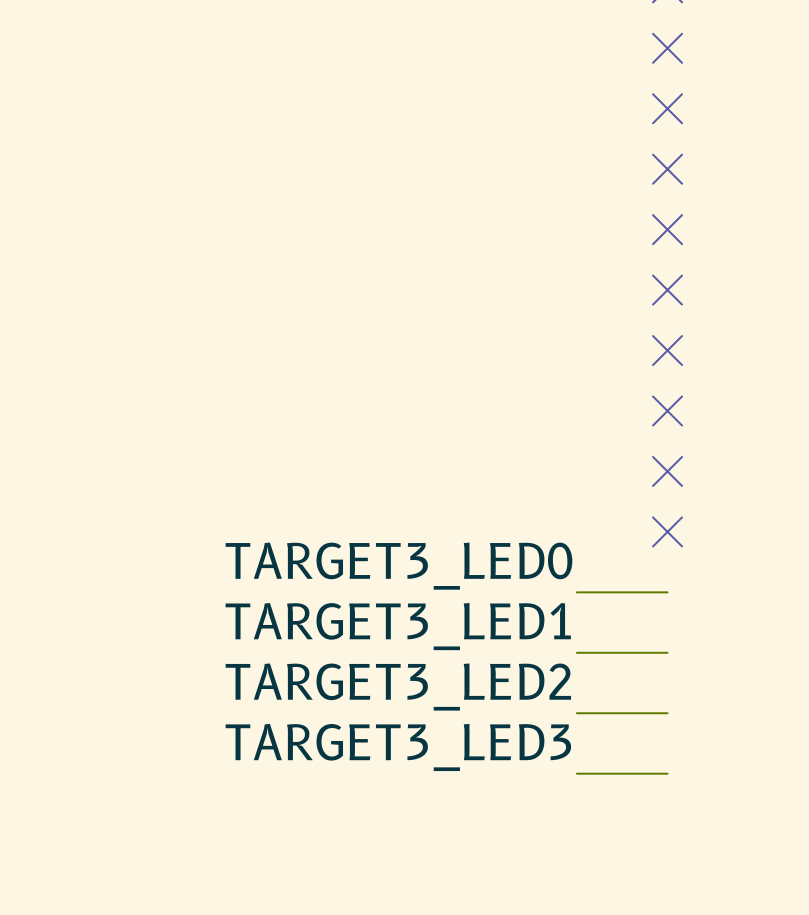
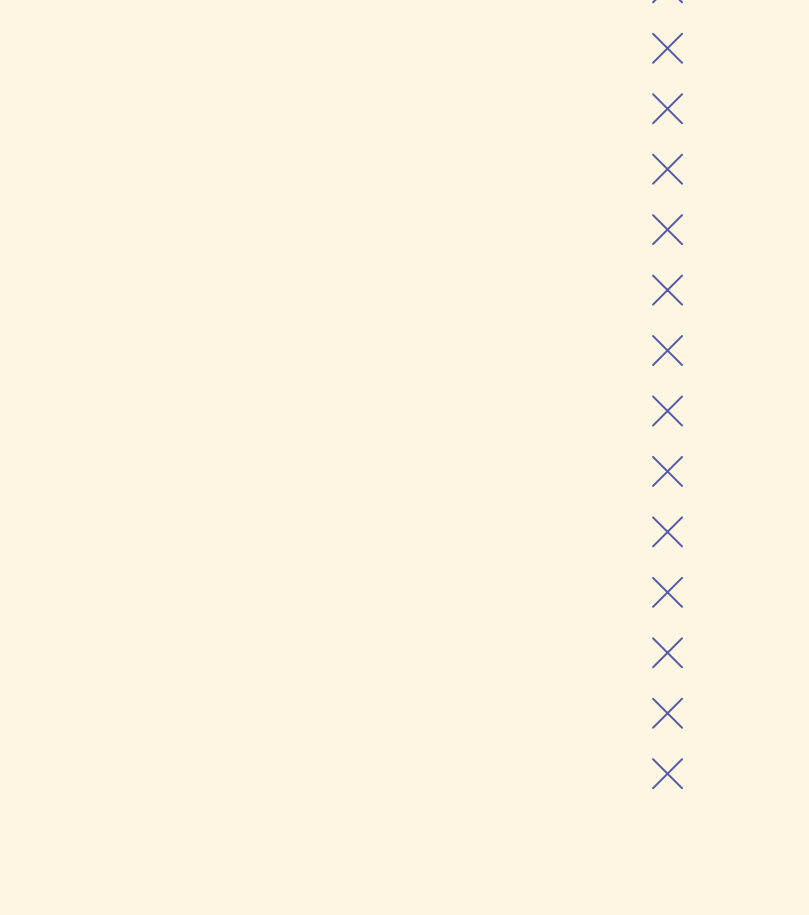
label: TARGET3_LED0 (398, 566) -> none
wire: (576, 592) (667, 592) -> none
no-connect mark: none -> (667, 592)
label: TARGET3_LED1 (398, 626) -> none
wire: (576, 652) (667, 652) -> none
no-connect mark: none -> (667, 652)
label: TARGET3_LED2 (398, 687) -> none
wire: (576, 713) (667, 713) -> none
no-connect mark: none -> (667, 713)
label: TARGET3_LED3 (398, 747) -> none
wire: (576, 773) (667, 773) -> none
no-connect mark: none -> (667, 773)

